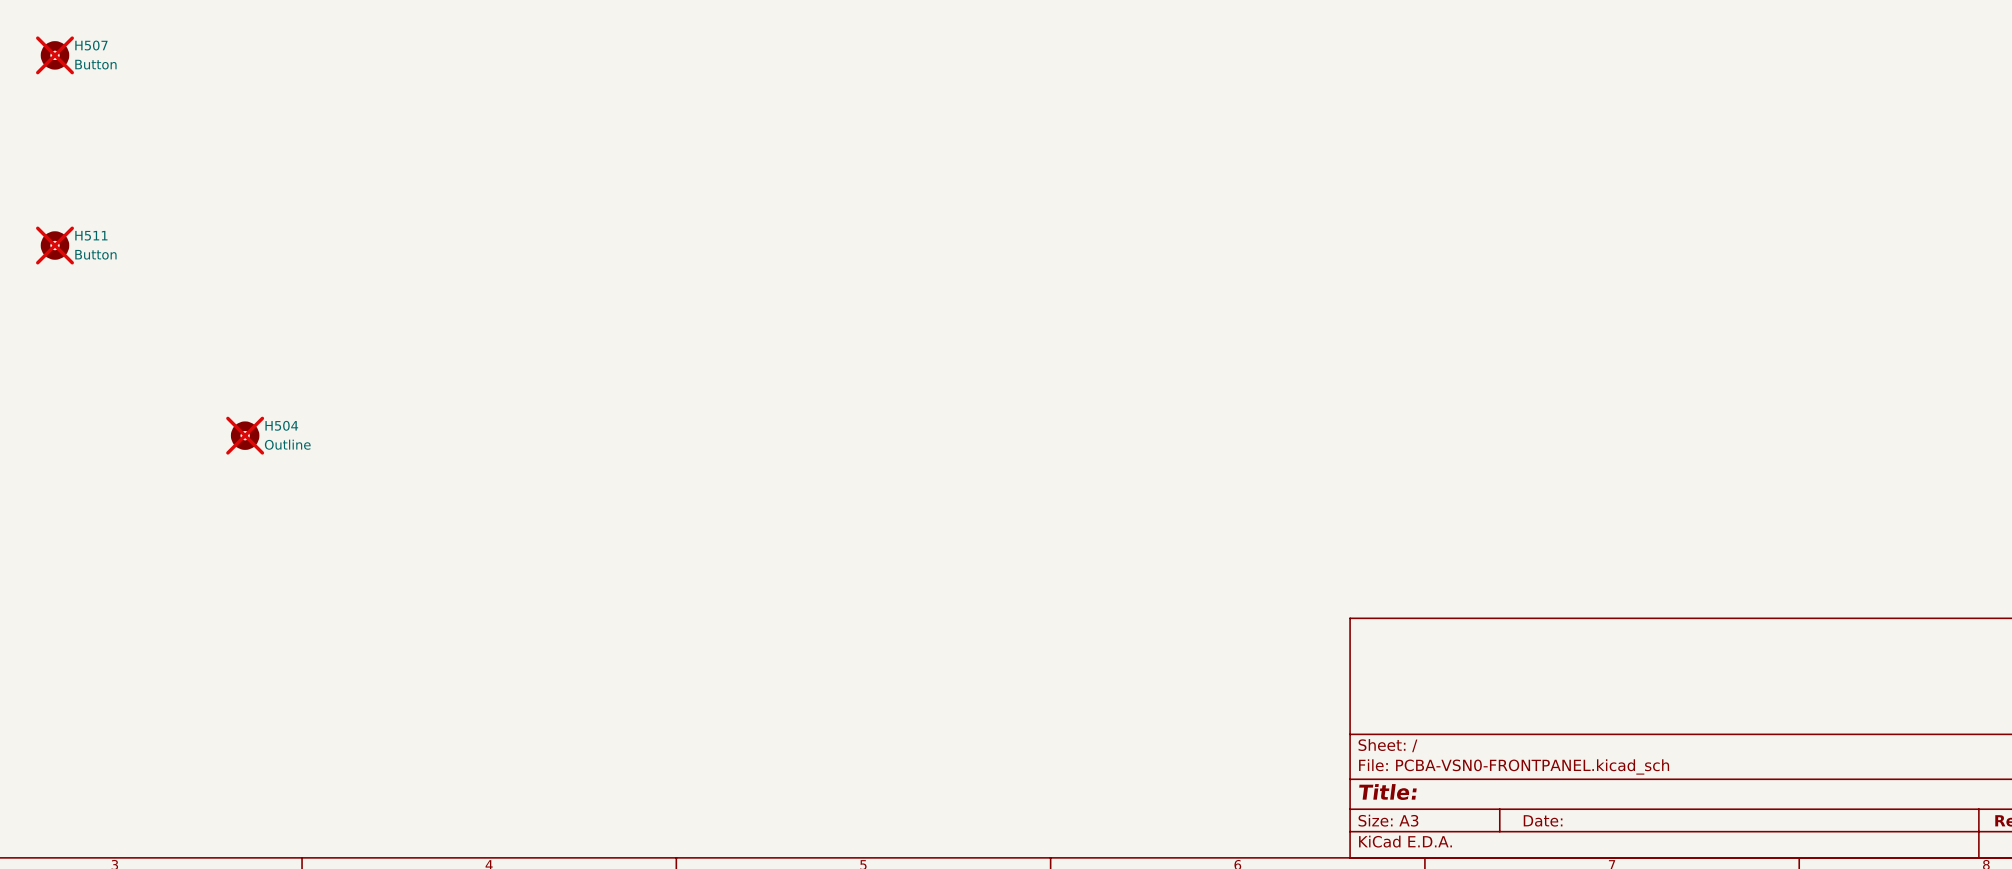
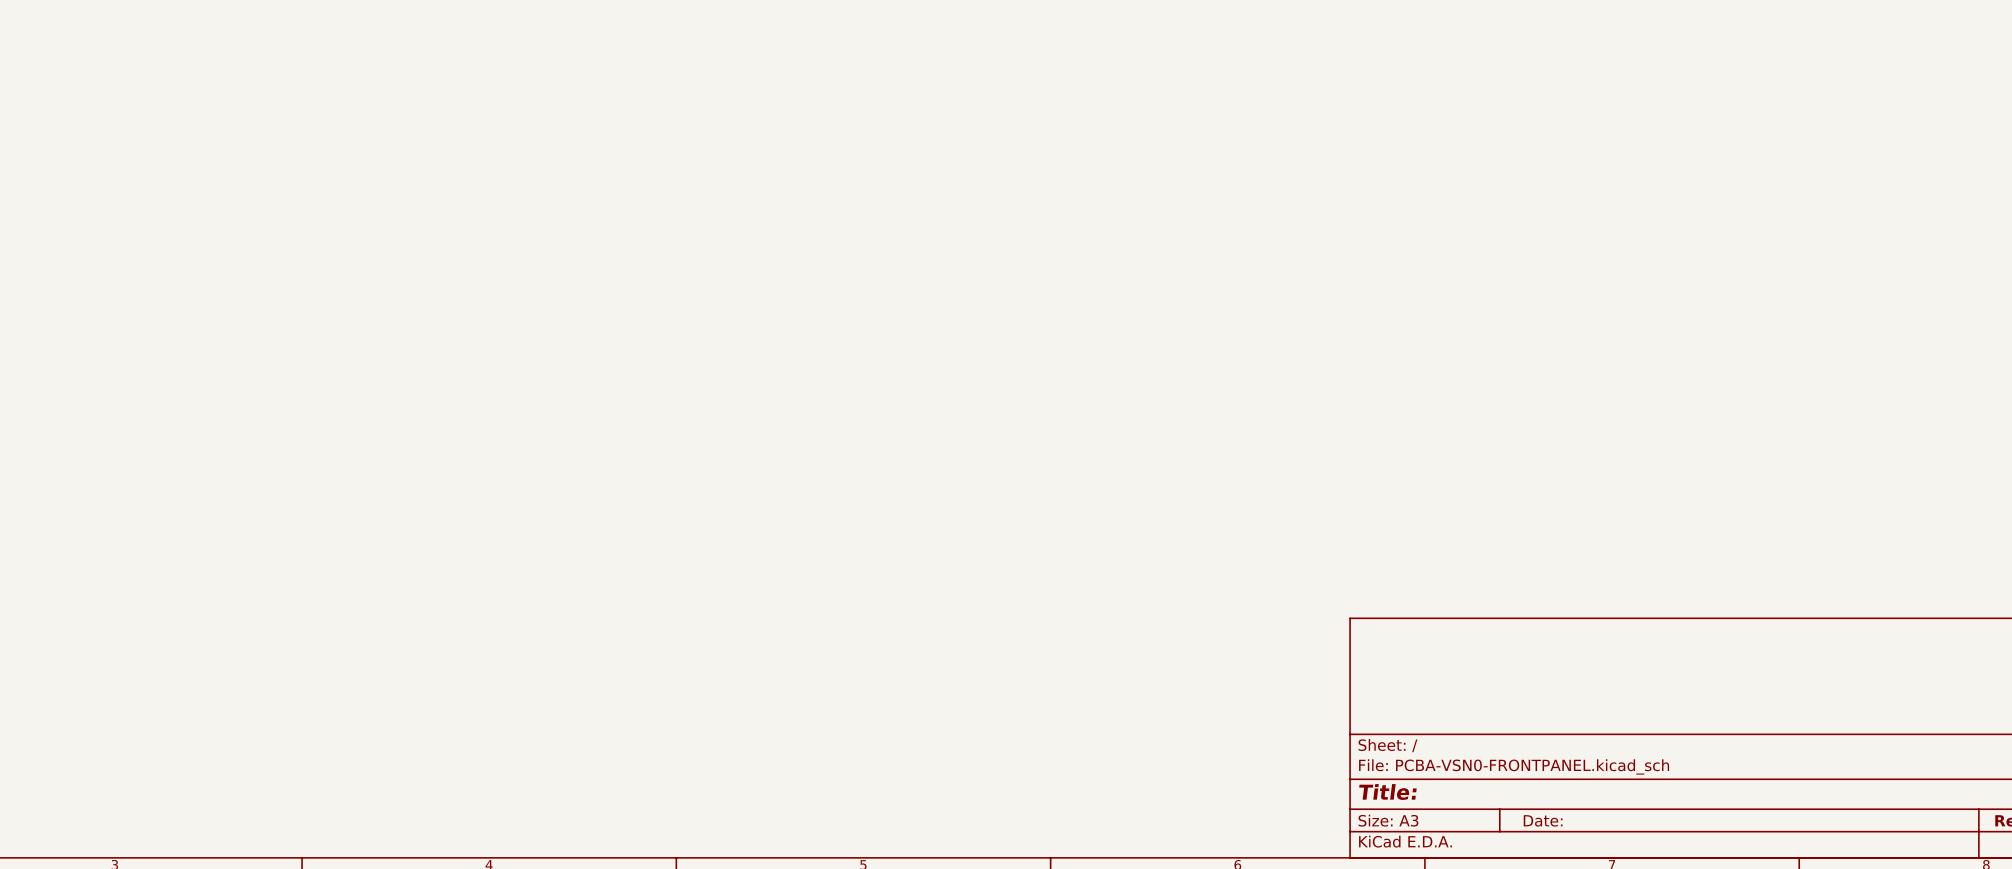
H507: Button (55, 55) -> none
H511: Button (55, 245) -> none
H504: Outline (245, 435) -> none

